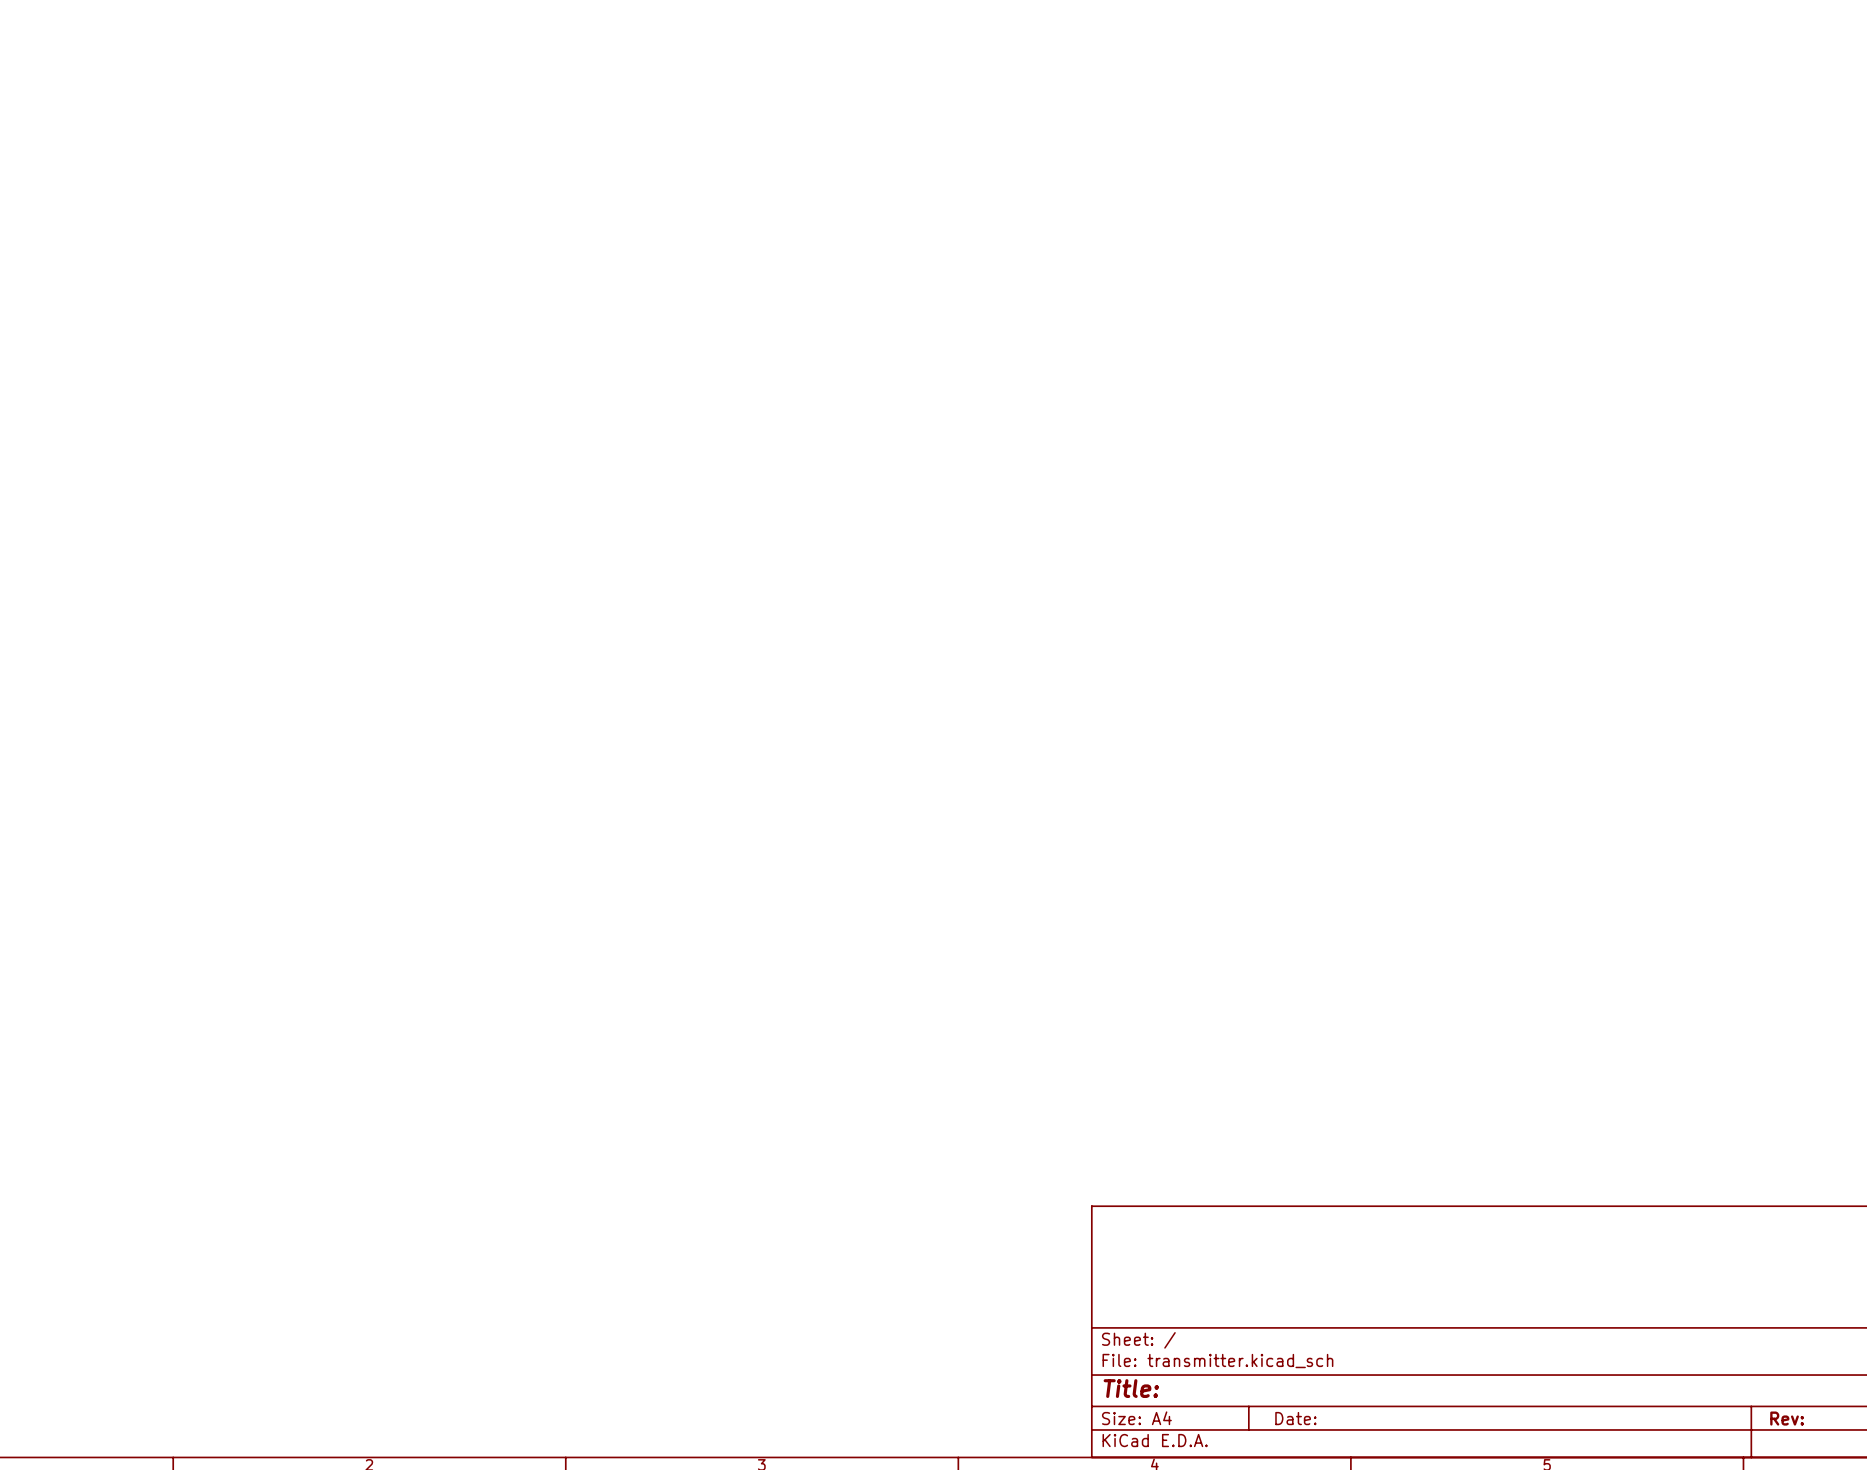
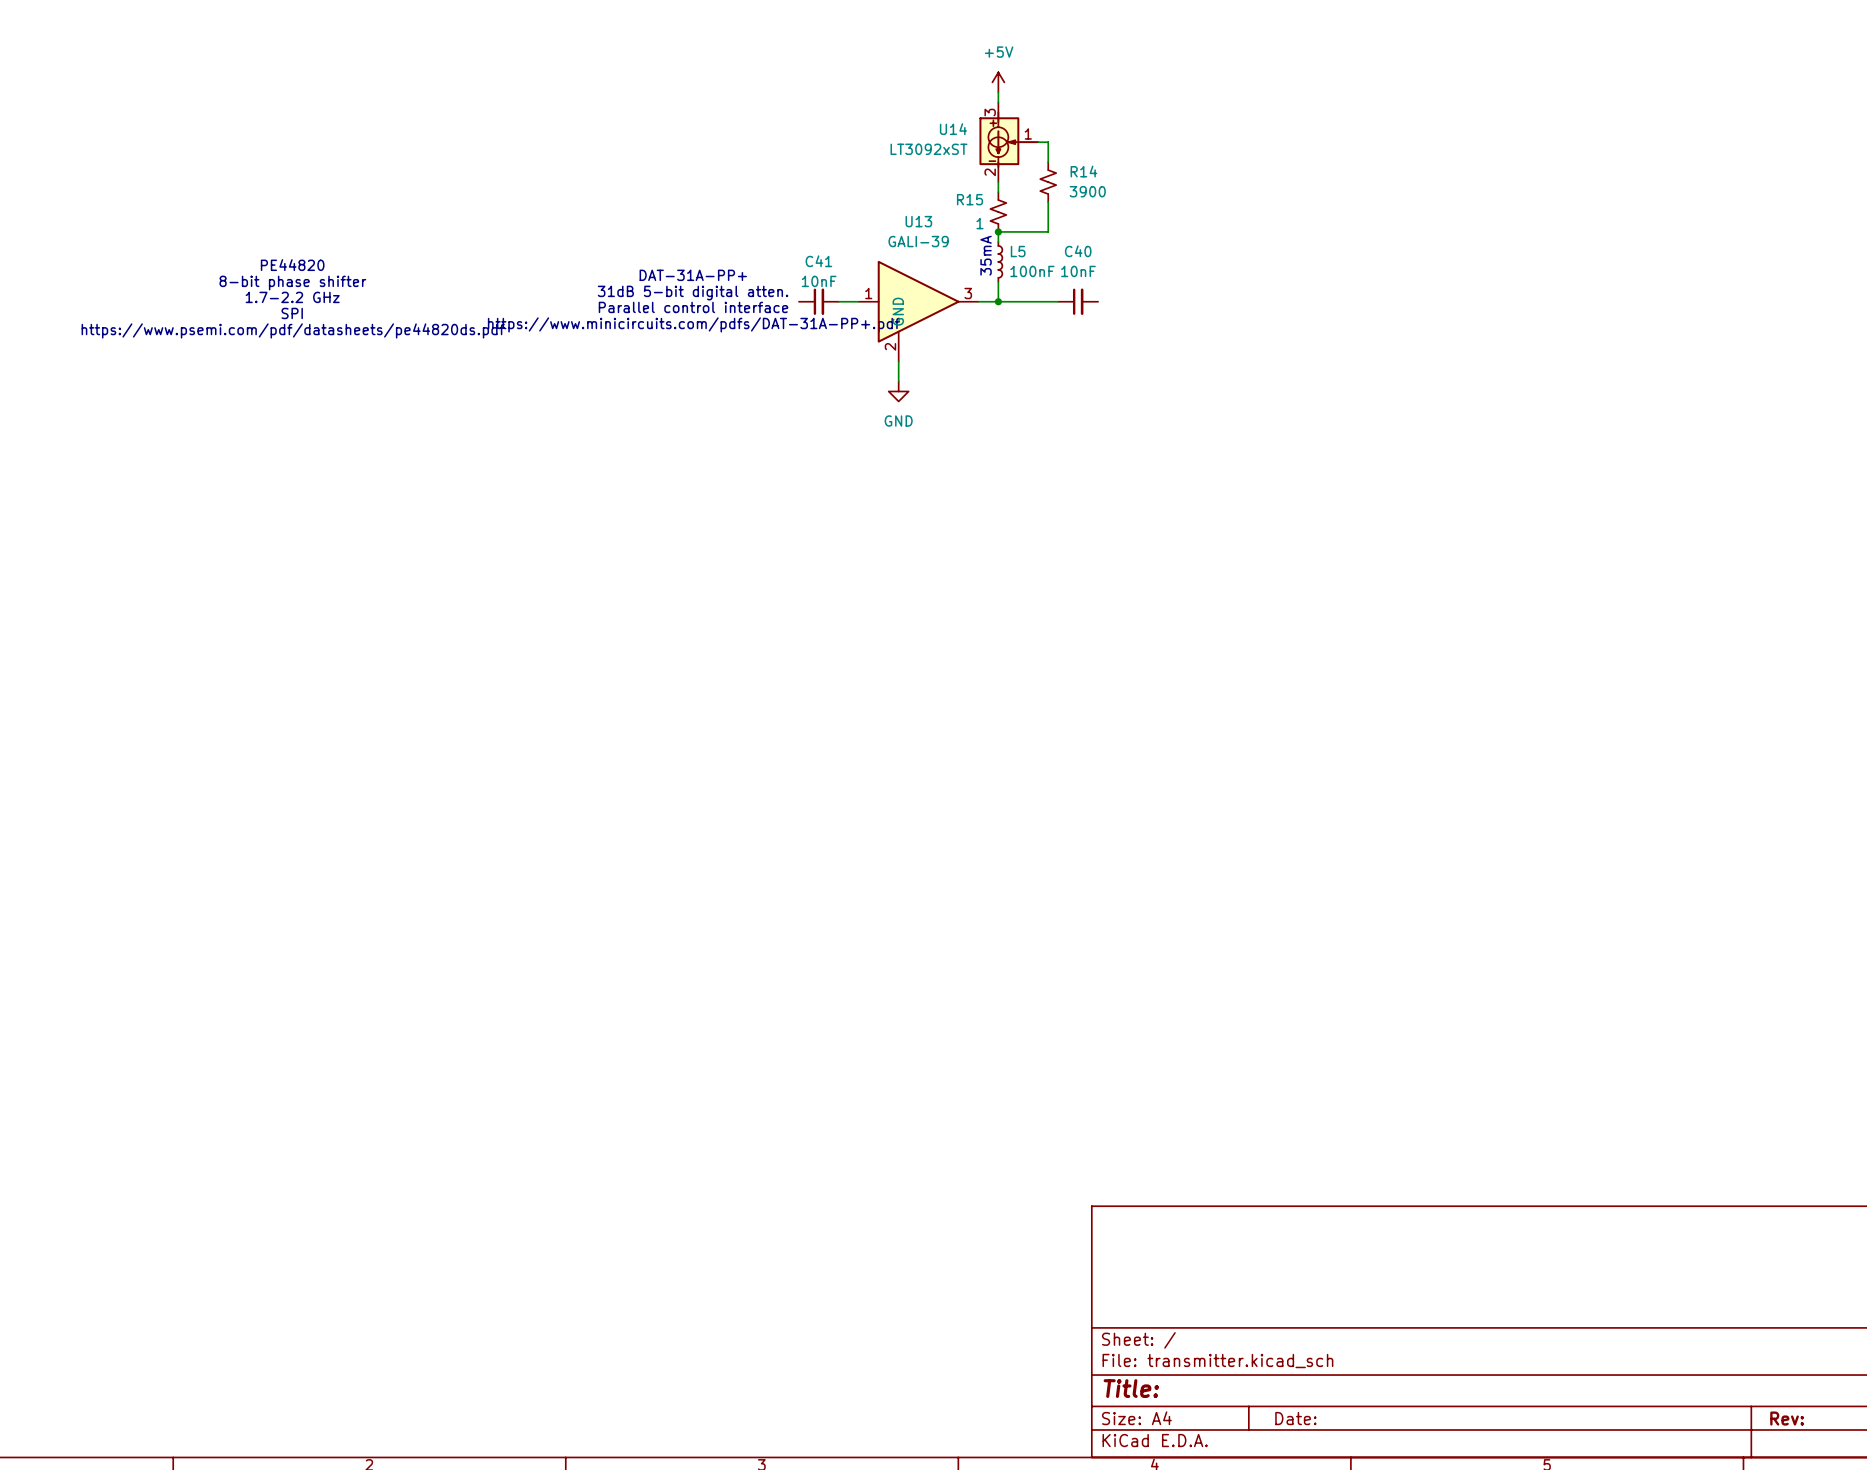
power symbol: none -> +5V (998, 82)
wire: none -> (998, 92) (998, 102)
U14: none -> LT3092xST (1008, 142)
wire: none -> (1038, 142) (1048, 142) (1048, 162)
wire: none -> (998, 182) (998, 192)
R14: none -> 3900 (1048, 182)
wire: none -> (1048, 202) (1048, 231) (998, 231) (998, 241)
R15: none -> 1 (998, 212)
junction: none -> (998, 231)
text: none -> 35mA (986, 255)
L5: none -> 100nF (1000, 261)
text: none -> PE44820 (292, 265)
text: none -> DAT-31A-PP+ (693, 275)
wire: none -> (998, 281) (998, 301)
text: none -> 8-bit phase shifter (292, 283)
text: none -> 31dB 5-bit digital atten. (693, 293)
text: none -> 1.7-2.2 GHz (292, 297)
C41: none -> 10nF (818, 301)
wire: none -> (838, 301) (858, 301)
wire: none -> (978, 301) (1058, 301)
junction: none -> (998, 301)
C40: none -> 10nF (1078, 301)
text: none -> Parallel control interface (693, 307)
U13: none -> GALI-39 (918, 311)
text: none -> SPI (292, 313)
text: none -> https://www.minicircuits.com/pdfs/DAT-31A-PP+.pdf (693, 324)
text: none -> https://www.psemi.com/pdf/datasheets/pe44820ds.pdf (293, 330)
wire: none -> (898, 361) (898, 381)
power symbol: none -> GND (898, 391)

